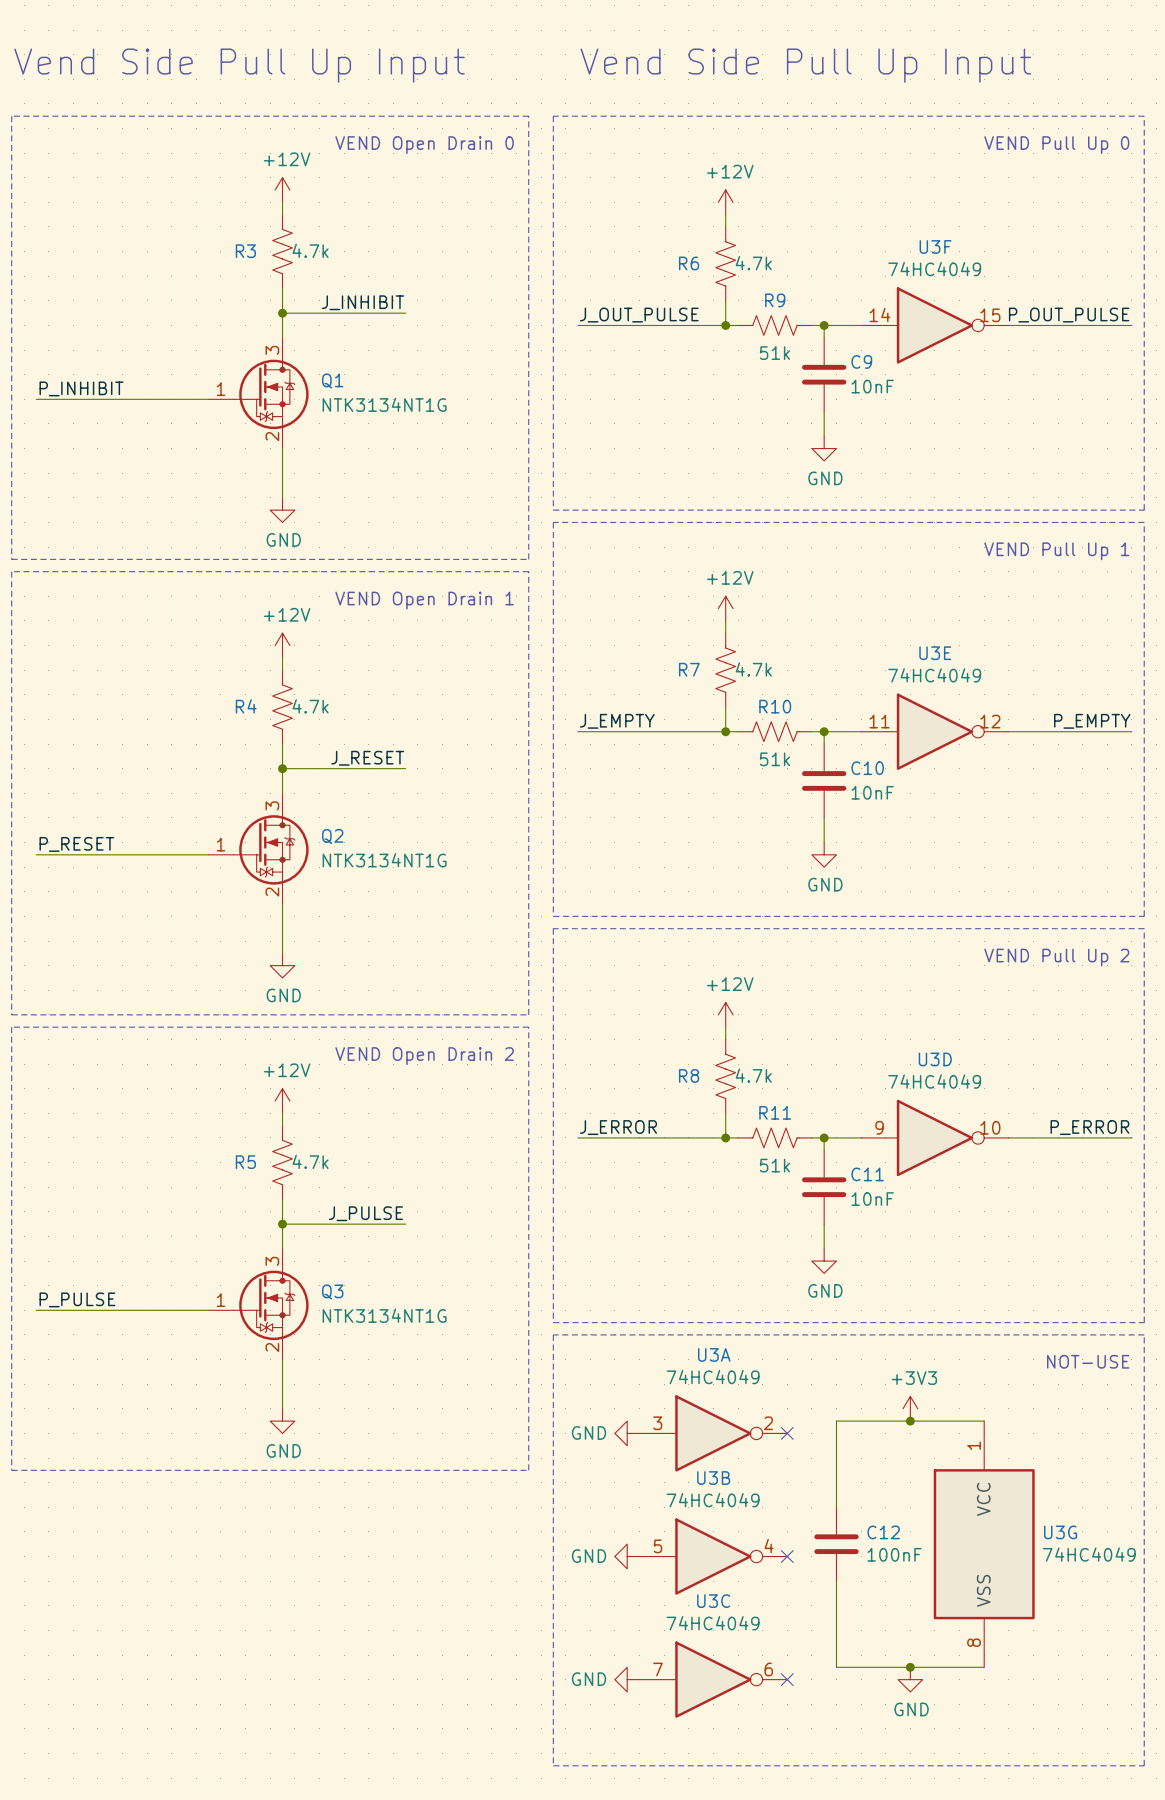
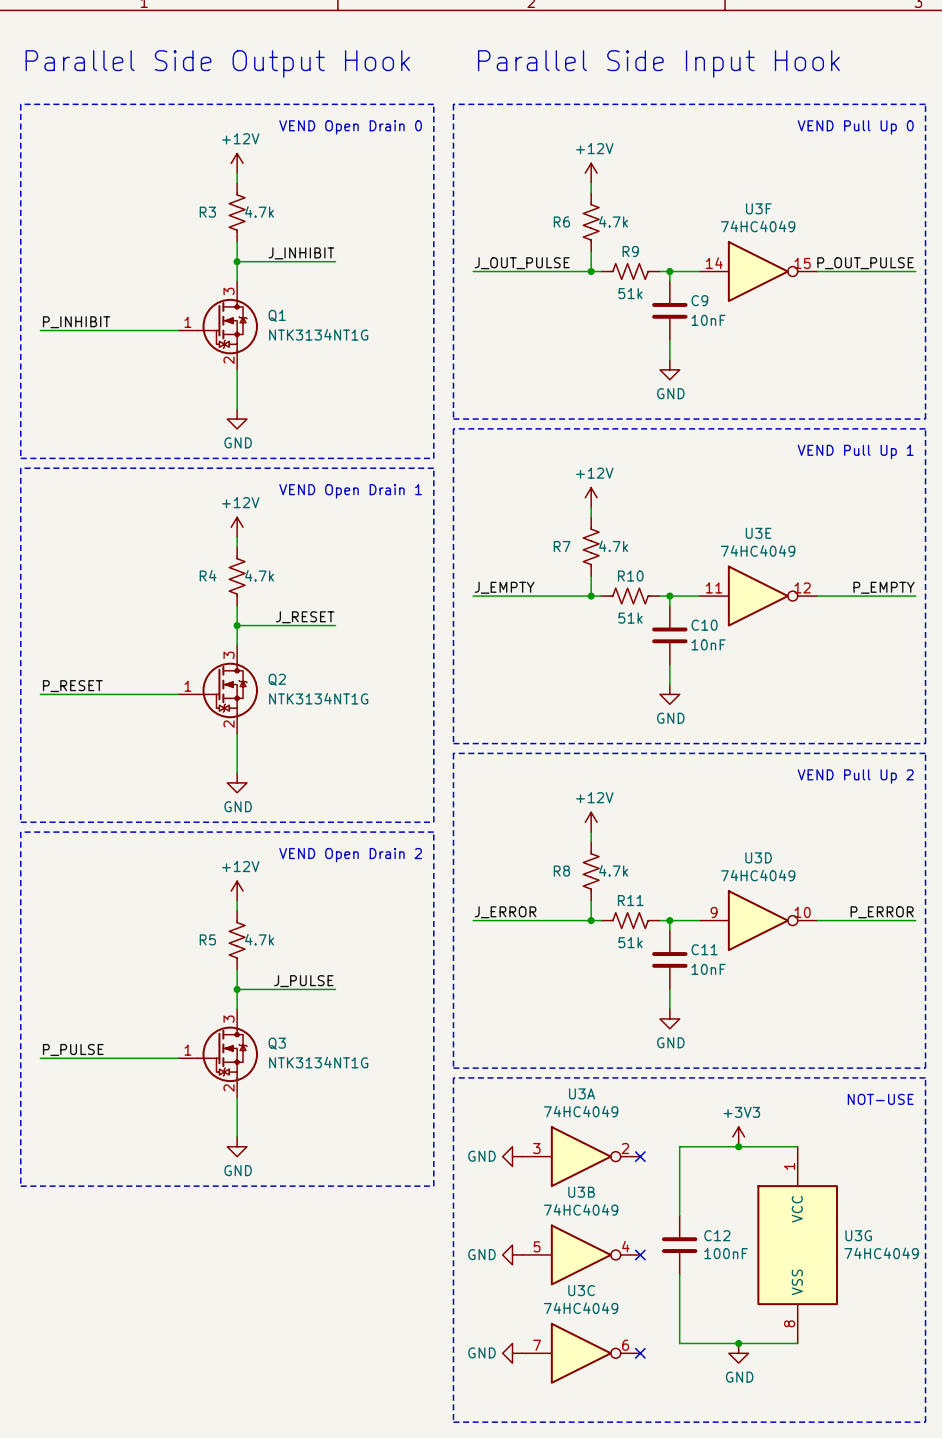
text: Vend Side Pull Up Input (239, 65) -> Parallel Side Output Hook (217, 63)
text: Vend Side Pull Up Input (805, 65) -> Parallel Side Input Hook (658, 63)

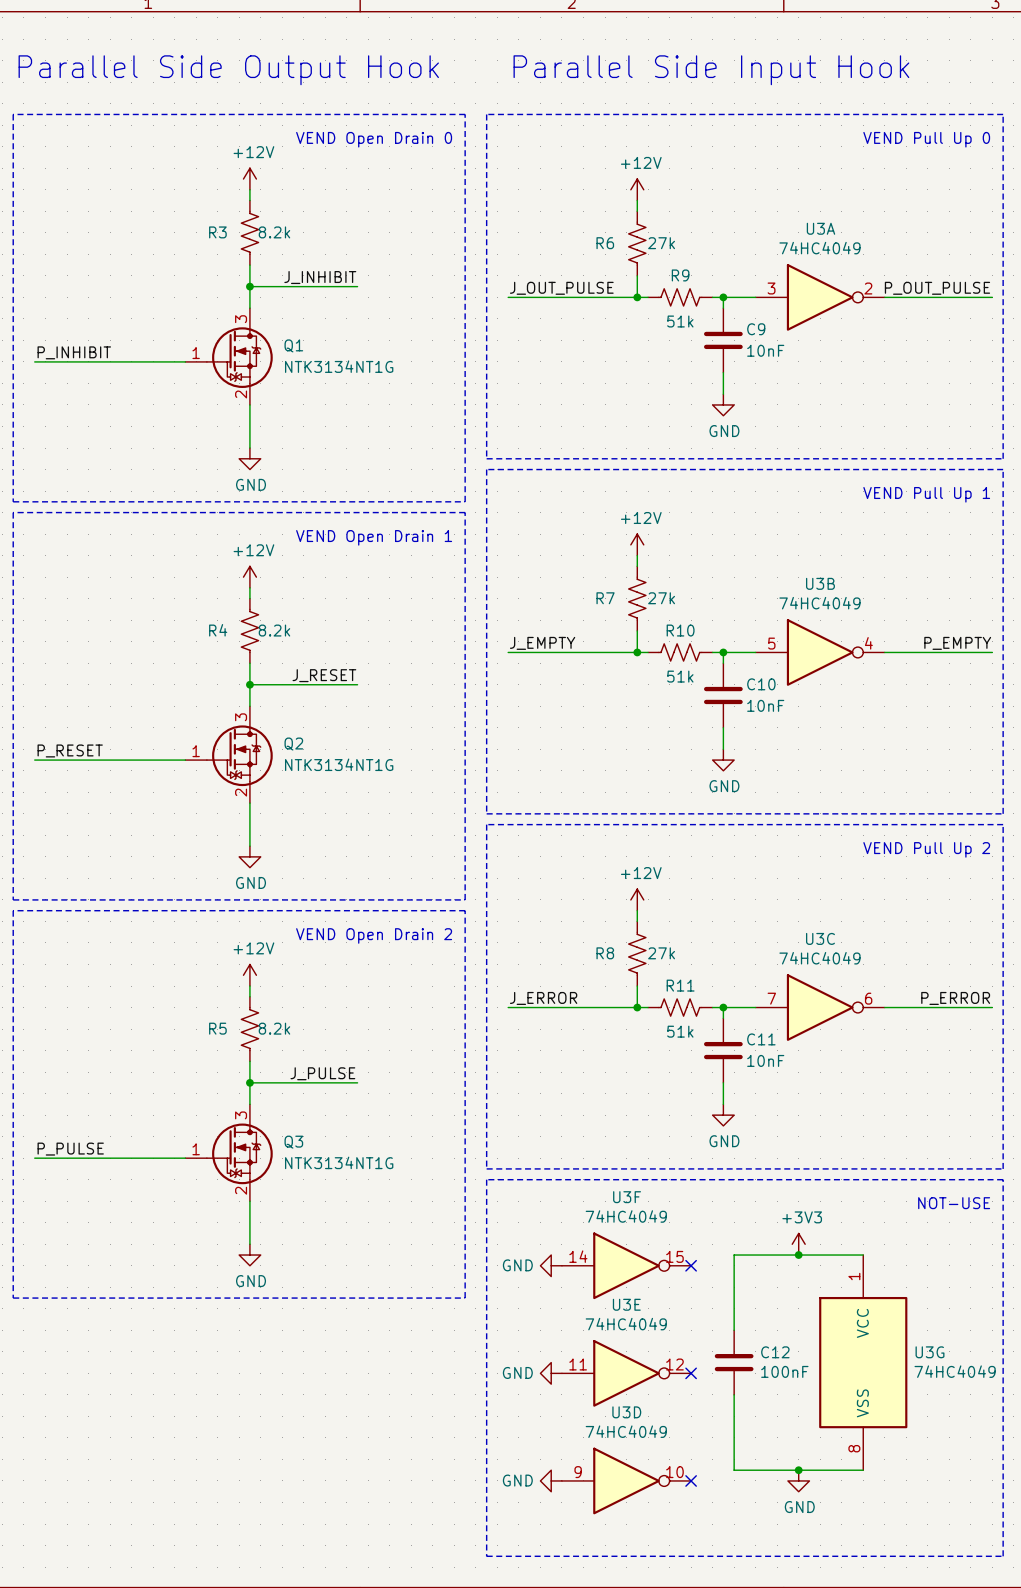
R3 value: 4.7k (259, 211) -> 8.2k (274, 232)
R6 value: 4.7k (613, 221) -> 27k (661, 243)
U3F position: (758, 271) -> (626, 1265)
R7 value: 4.7k (613, 546) -> 27k (661, 598)
R4 value: 4.7k (259, 575) -> 8.2k (274, 630)
U3E position: (758, 596) -> (626, 1373)
R8 value: 4.7k (613, 870) -> 27k (661, 953)
U3D position: (758, 920) -> (626, 1480)
R5 value: 4.7k (259, 939) -> 8.2k (274, 1028)
U3A position: (581, 1156) -> (820, 297)
U3B position: (581, 1254) -> (820, 652)
U3C position: (581, 1353) -> (820, 1007)

